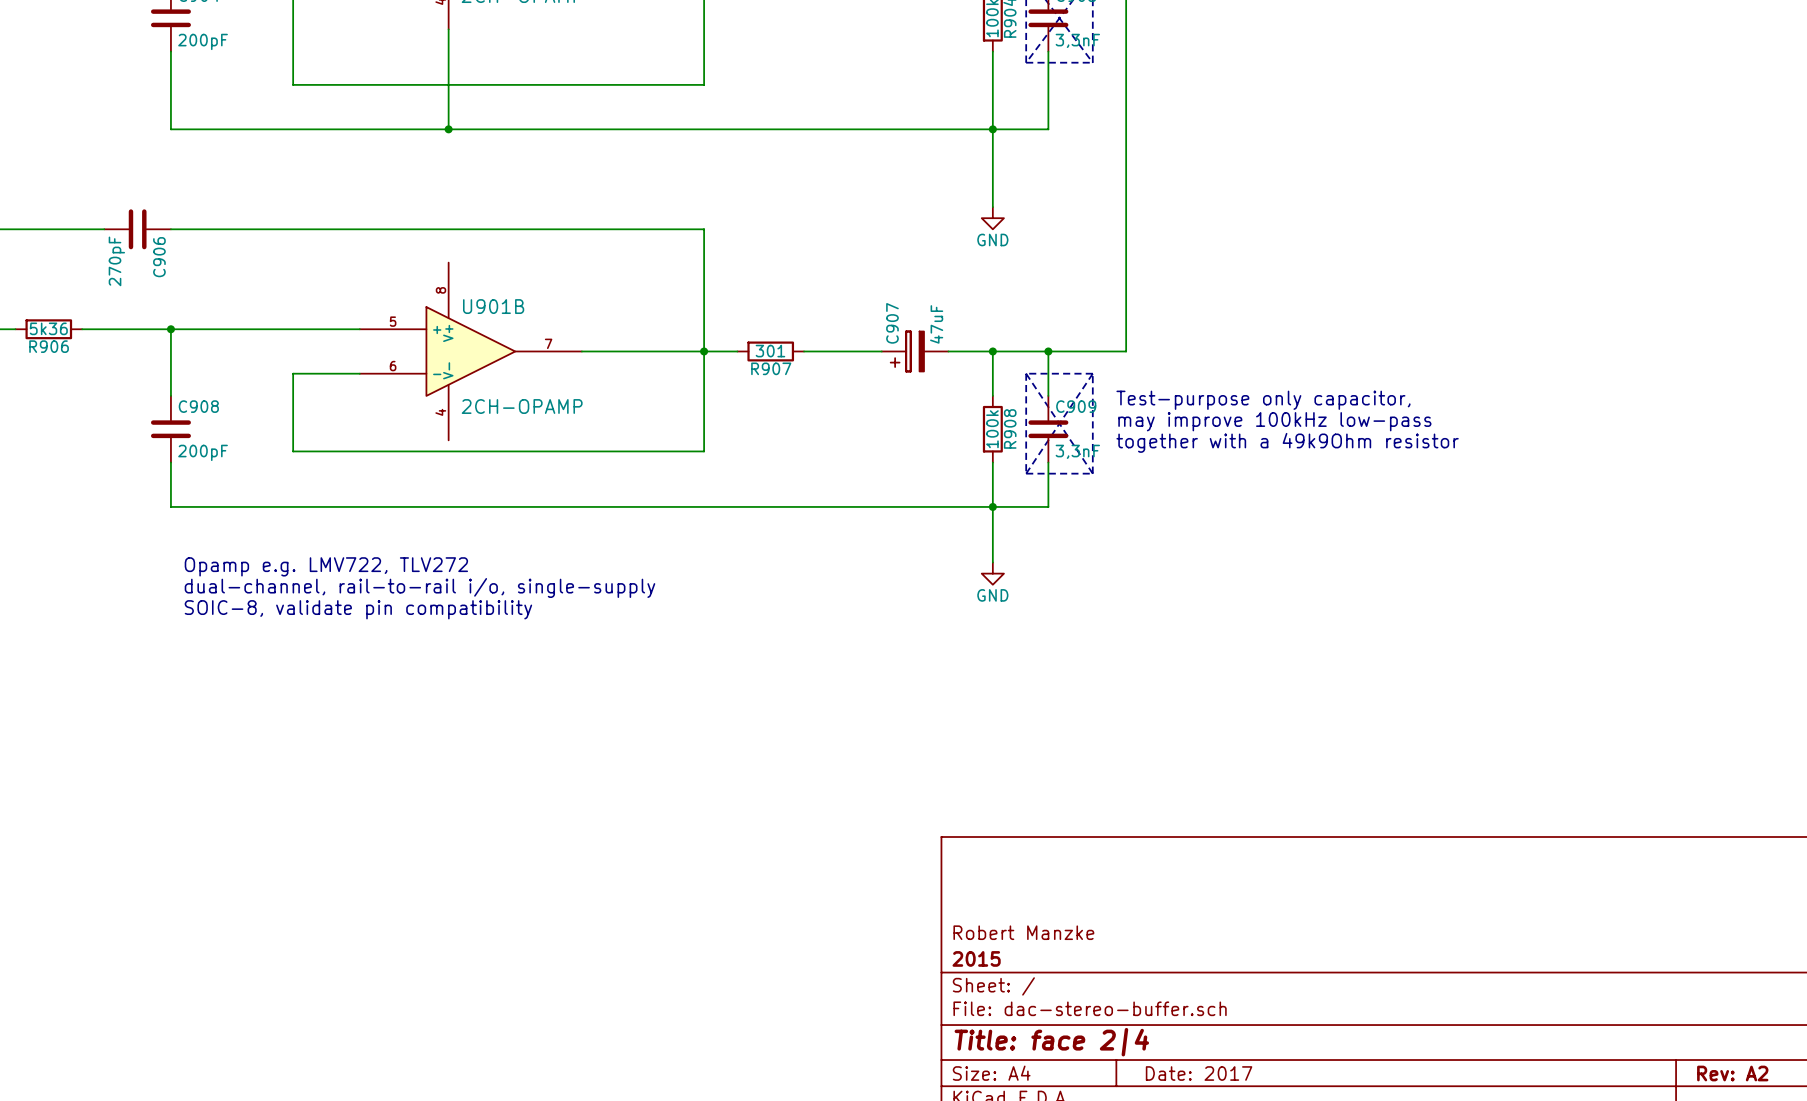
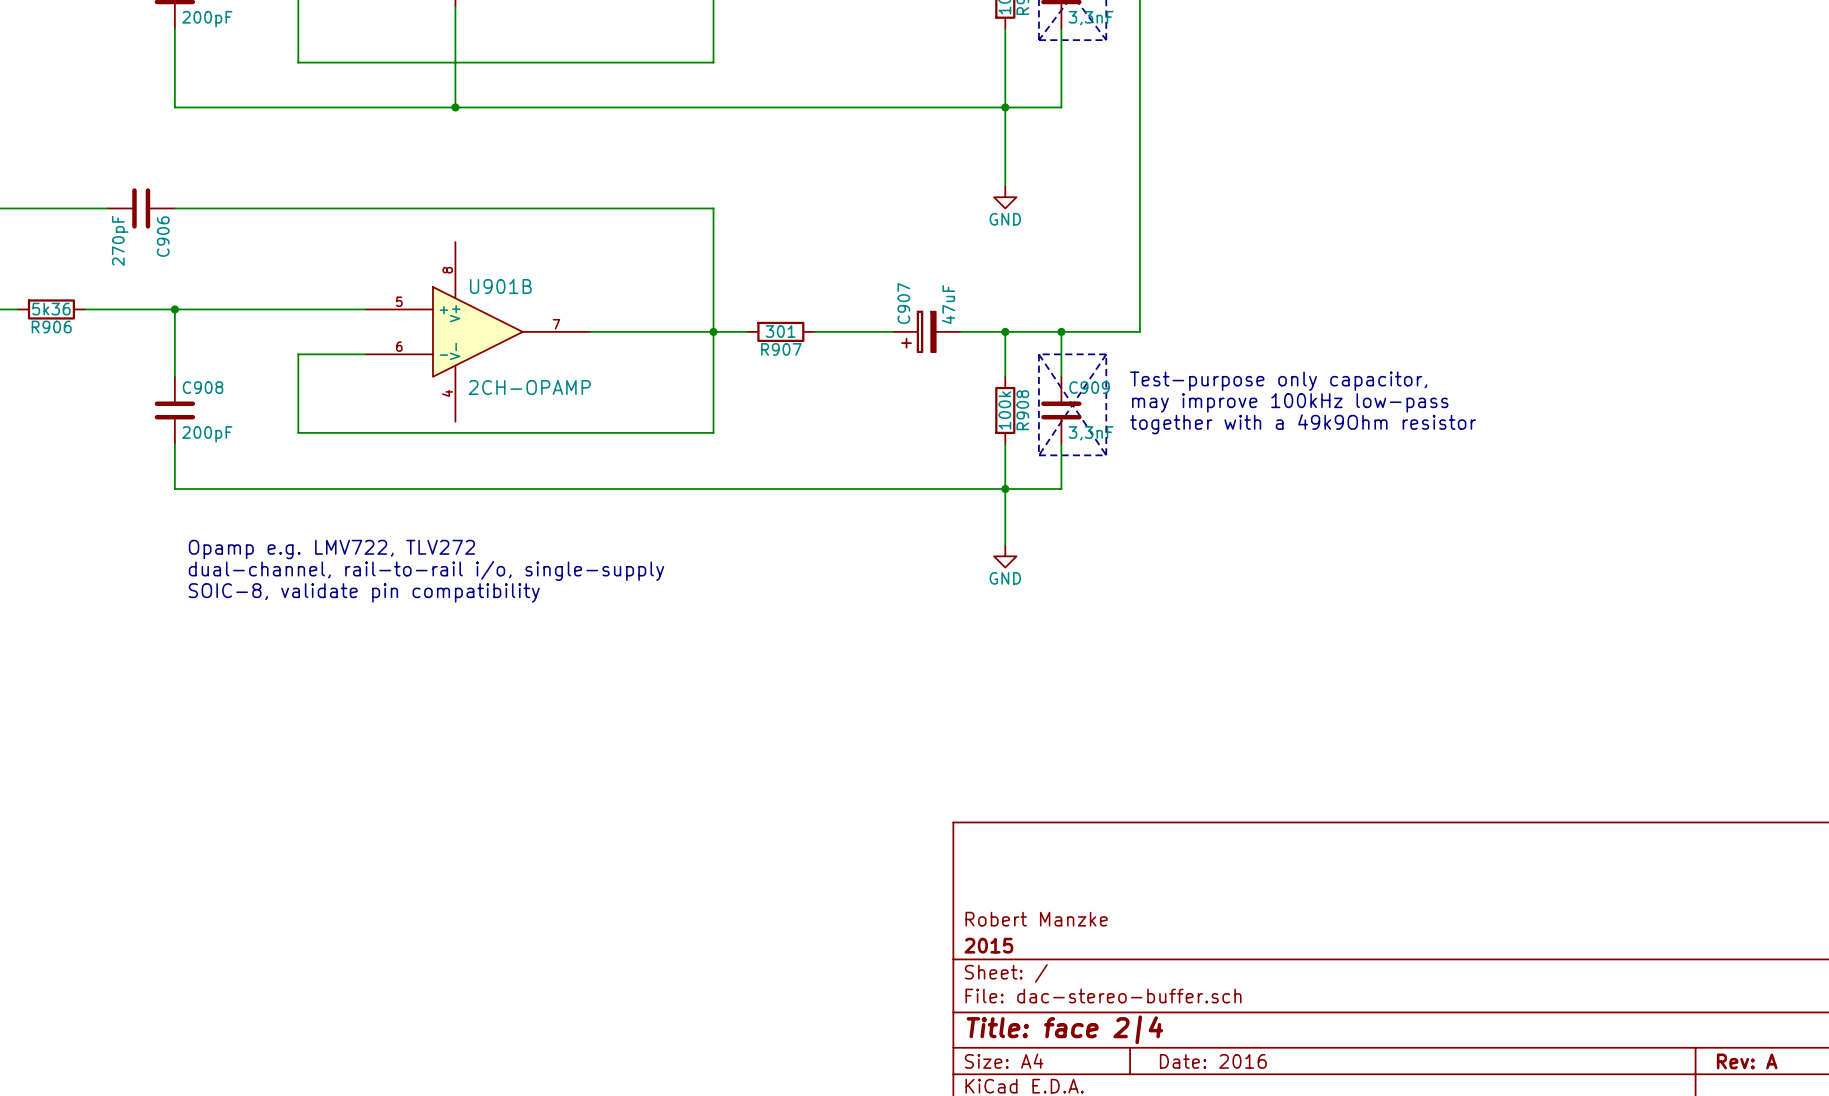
title block: Date: 2017 (1199, 1073) -> Date: 2016 (1213, 1061)
title block: Rev: A2 (1732, 1073) -> Rev: A (1747, 1061)

